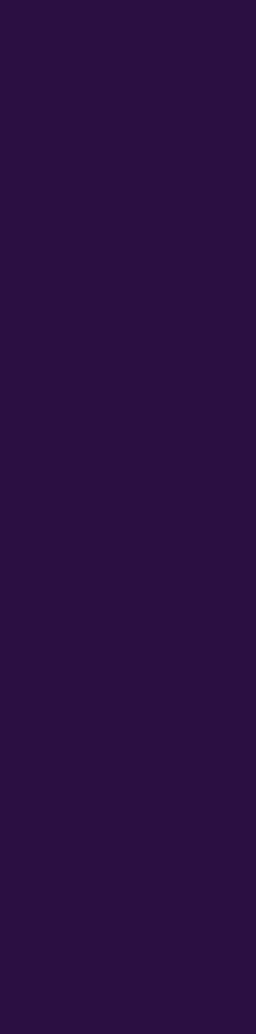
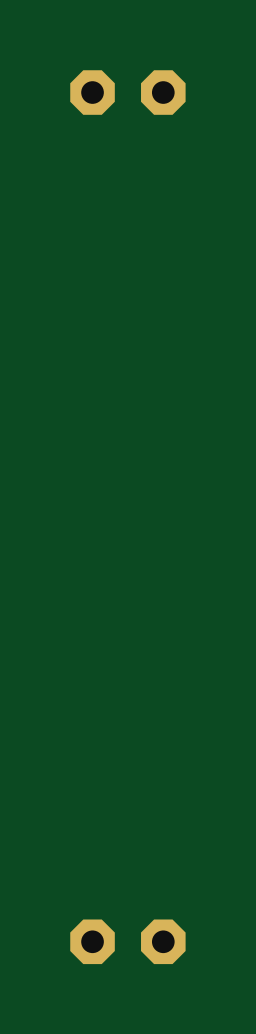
part: none -> (127, 92)
part: none -> (127, 941)

